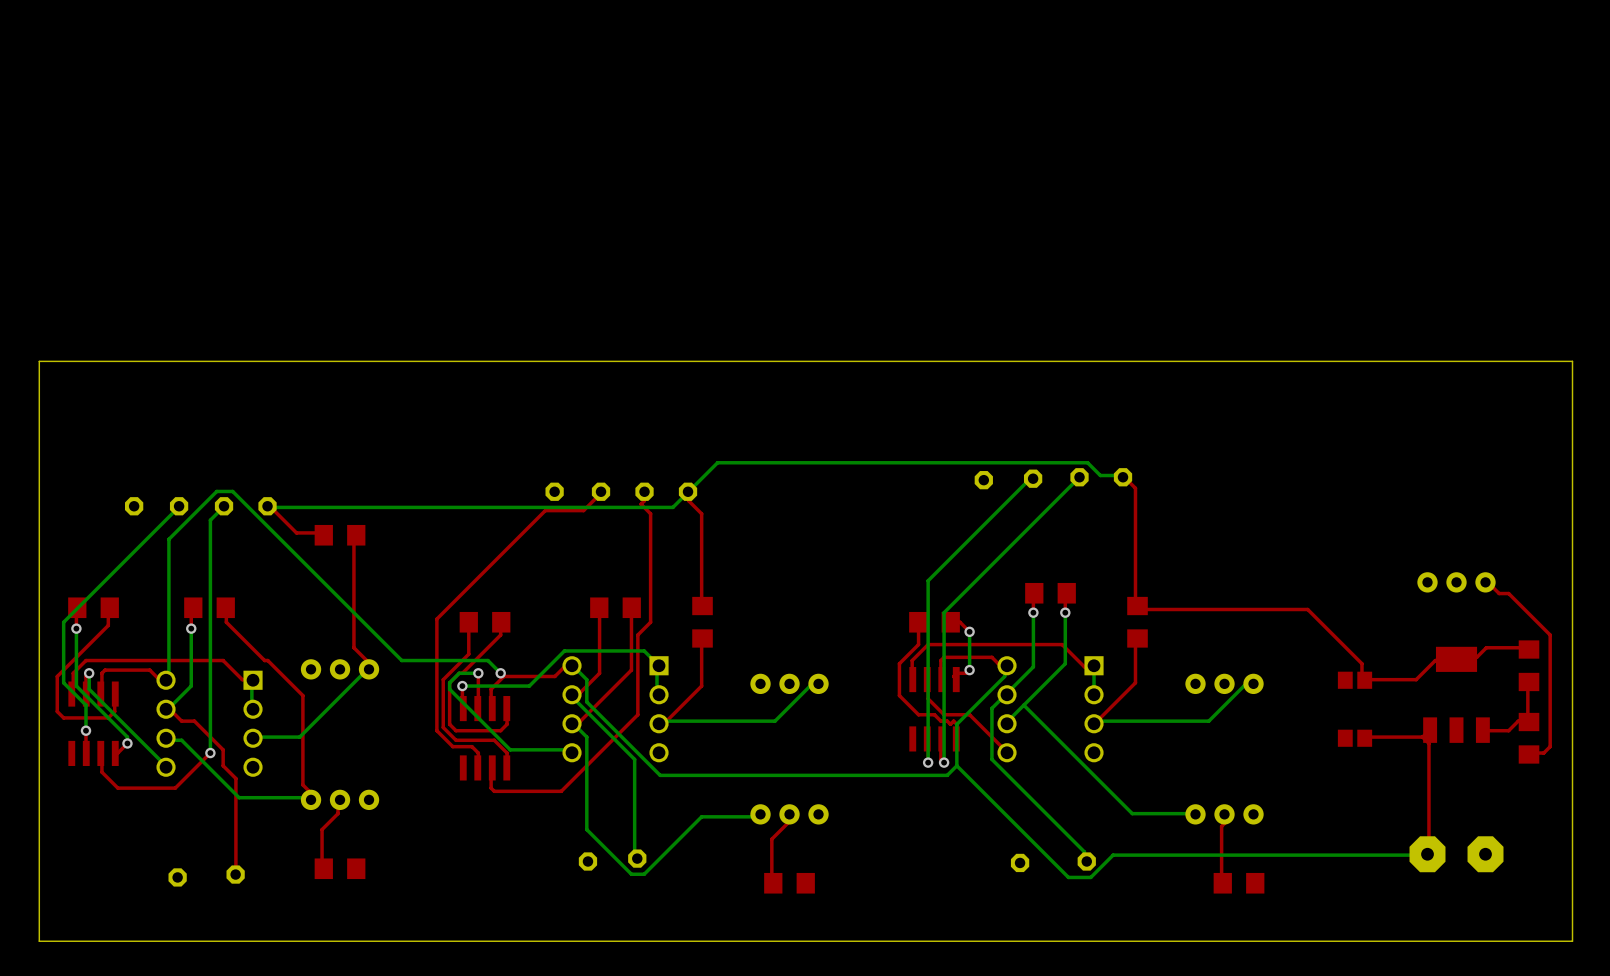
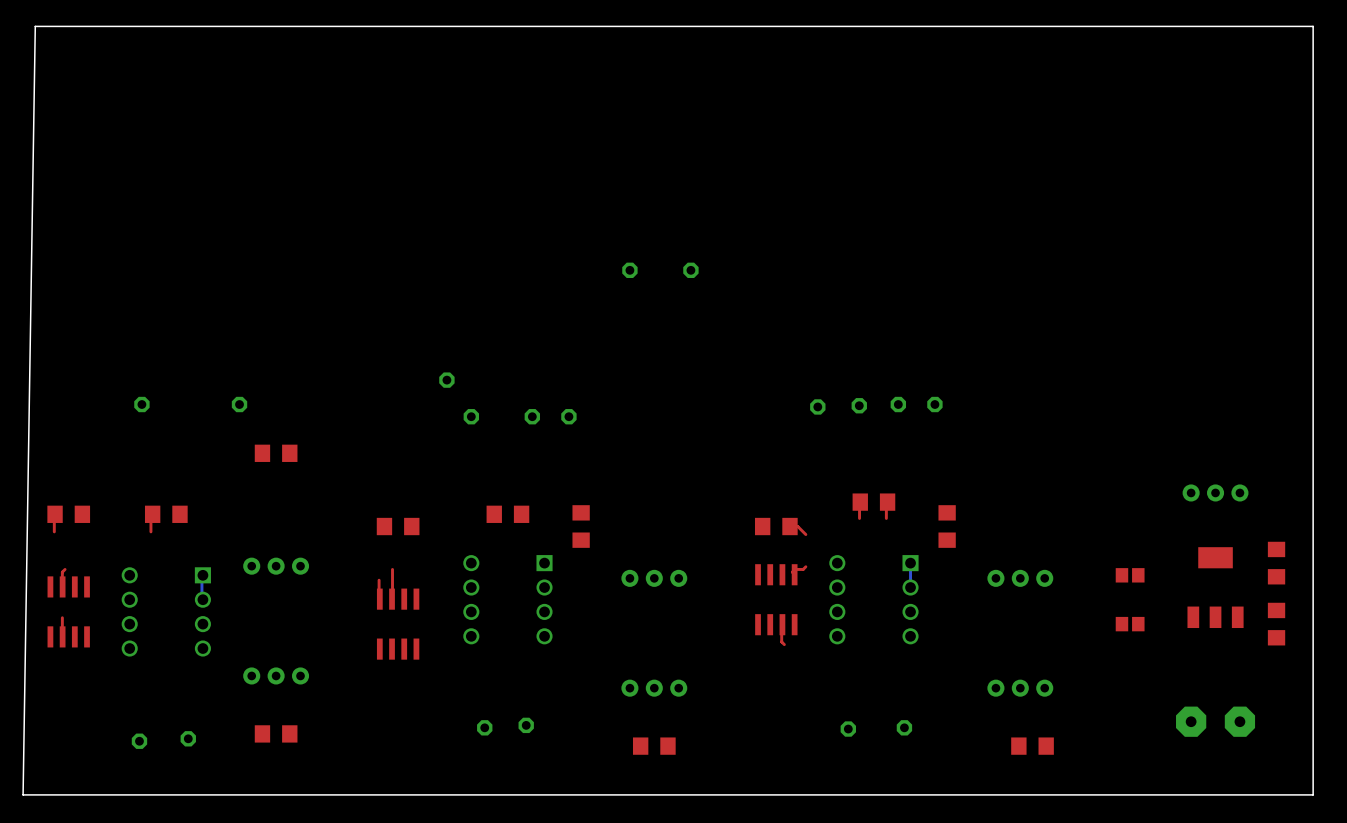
part: none -> (629, 270)
part: none -> (690, 270)
board edge: (1572, 361) (39, 361) (39, 941) -> (1313, 307) (1313, 26) (35, 26) (23, 794)
part: none -> (446, 380)
part: none -> (141, 404)
part: none -> (239, 404)
bottom track: (1079, 477) (944, 612) (944, 762) -> none
top track: (1123, 477) (1125, 475) (1135, 488) (1135, 603) (1141, 609) (1307, 609) (1361, 663) (1361, 679) (1364, 680) (1416, 679) (1435, 660) (1476, 657) (1486, 647) (1527, 647) (1529, 649) -> none
bottom track: (1123, 477) (1122, 475) (1100, 475) (1087, 462) (717, 462) (672, 507) (267, 506) -> none
bottom track: (1033, 478) (1030, 478) (928, 580) (928, 762) -> none
part: (554, 491) -> none
part: none -> (471, 416)
top track: (601, 491) (602, 494) (596, 497) (583, 510) (545, 510) (436, 619) (436, 730) (452, 746) (471, 746) (478, 753) (477, 767) -> none
part: (601, 491) -> none
top track: (644, 491) (644, 501) (641, 504) (650, 513) (650, 622) (637, 635) (637, 714) (561, 791) (494, 791) (491, 788) (492, 767) -> none
top track: (688, 491) (688, 501) (701, 513) (702, 606) -> none
part: (134, 506) -> none
bottom track: (179, 506) (63, 622) (63, 682) (85, 705) (85, 730) -> none
part: (179, 506) -> none
bottom track: (224, 506) (210, 520) (210, 753) -> none
part: (224, 506) -> none
top track: (267, 506) (267, 504) (296, 532) (322, 532) (323, 535) -> none
part: (267, 506) -> none
top track: (356, 535) (353, 536) (353, 647) (366, 660) (366, 666) (369, 669) -> none
top track: (1485, 582) (1486, 580) (1499, 593) (1508, 593) (1550, 635) (1550, 746) (1543, 753) (1529, 754) -> none
top track: (109, 607) (108, 625) (57, 676) (57, 711) (63, 717) (108, 717) (114, 711) (115, 694) -> none
top track: (225, 607) (226, 622) (302, 695) (302, 784) (309, 791) (311, 799) -> none
top track: (599, 607) (599, 673) (580, 692) (574, 692) (572, 694) -> none
top track: (631, 607) (631, 670) (580, 721) (574, 721) (572, 723) -> none
bottom track: (1033, 612) (1033, 666) (991, 708) (991, 759) (1084, 851) (1084, 861) (1086, 861) -> none
via: (1033, 612) -> none
bottom track: (1065, 612) (1065, 663) (1007, 723) -> none
via: (1065, 612) -> none
top track: (468, 622) (468, 654) (443, 679) (443, 727) (456, 740) (494, 740) (507, 753) (506, 767) -> none
top track: (501, 622) (500, 635) (462, 673) (459, 673) (449, 682) (449, 724) (456, 730) (500, 730) (507, 724) (506, 708) -> none
top track: (918, 622) (918, 644) (899, 663) (899, 695) (918, 714) (934, 714) (940, 721) (947, 721) (950, 724) (953, 721) (956, 724) (956, 738) -> none
bottom track: (76, 628) (76, 686) (127, 737) (127, 743) -> none
via: (76, 628) -> none
bottom track: (191, 628) (191, 686) (166, 709) -> none
via: (191, 628) -> none
bottom track: (969, 631) (969, 670) -> none
via: (969, 631) -> none
top track: (702, 638) (701, 686) (666, 721) (660, 721) (659, 723) -> none
top track: (1137, 638) (1135, 641) (1135, 682) (1094, 723) -> none
top track: (572, 665) (564, 666) (554, 676) (503, 676) -> none
bottom track: (572, 665) (586, 679) (586, 702) (660, 775) (947, 775) (956, 765) -> none
top track: (1007, 665) (998, 663) (991, 657) (944, 657) (940, 660) (941, 679) -> none
bottom track: (1007, 665) (1004, 666) (1004, 676) (956, 724) (956, 765) -> none
top track: (1094, 665) (1084, 666) (1062, 644) (928, 644) (912, 660) (912, 679) -> none
bottom track: (369, 669) (299, 737) (253, 738) -> none
via: (969, 670) -> none
bottom track: (89, 673) (89, 689) (166, 767) -> none
via: (89, 673) -> none
bottom track: (478, 673) (459, 673) (449, 682) (449, 689) (510, 749) (570, 749) (572, 752) -> none
via: (478, 673) -> none
bottom track: (500, 673) (487, 660) (401, 660) (232, 491) (216, 491) (168, 539) (168, 679) (166, 680) -> none
via: (500, 673) -> none
top track: (503, 676) (491, 689) (492, 708) -> none
top track: (927, 679) (928, 698) (944, 714) (969, 714) (1001, 746) (1007, 749) (1007, 752) -> none
top track: (166, 680) (159, 679) (149, 670) (105, 670) (101, 673) (100, 694) -> none
top track: (253, 680) (242, 679) (223, 660) (85, 660) (73, 673) (71, 694) -> none
top track: (1529, 681) (1527, 721) -> none
bottom track: (818, 683) (816, 686) (810, 686) (775, 721) (660, 721) (659, 723) -> none
bottom track: (1253, 683) (1253, 686) (1243, 686) (1208, 721) (1094, 721) (1094, 723) -> none
bottom track: (462, 686) (529, 686) (564, 650) (644, 650) (659, 665) (656, 666) (656, 692) (659, 694) -> none
via: (462, 686) -> none
bottom track: (572, 694) (634, 759) (634, 858) (637, 858) -> none
bottom track: (1023, 705) (1132, 813) (1195, 814) -> none
top track: (166, 709) (168, 708) (181, 721) (194, 721) (223, 749) (223, 765) (235, 778) (235, 874) -> none
top track: (1527, 721) (1518, 721) (1508, 730) (1482, 730) -> none
bottom track: (572, 723) (586, 737) (586, 829) (631, 874) (644, 874) (701, 816) (759, 816) (760, 814) -> none
via: (85, 730) -> none
top track: (1422, 737) (1364, 738) -> none
top track: (1422, 737) (1428, 743) (1427, 854) -> none
bottom track: (166, 738) (168, 740) (181, 740) (239, 797) (309, 797) (311, 799) -> none
top track: (127, 743) (115, 753) -> none
via: (127, 743) -> none
top track: (210, 753) (175, 788) (117, 788) (101, 772) (100, 753) -> none
via: (210, 753) -> none
via: (928, 762) -> none
via: (944, 762) -> none
bottom track: (956, 765) (1068, 877) (1090, 877) (1113, 855) (1427, 854) -> none
top track: (340, 799) (338, 800) (338, 813) (322, 829) (322, 867) (323, 868) -> none
top track: (789, 814) (787, 823) (771, 839) (773, 883) -> none
top track: (1224, 814) (1224, 823) (1221, 826) (1222, 883) -> none

